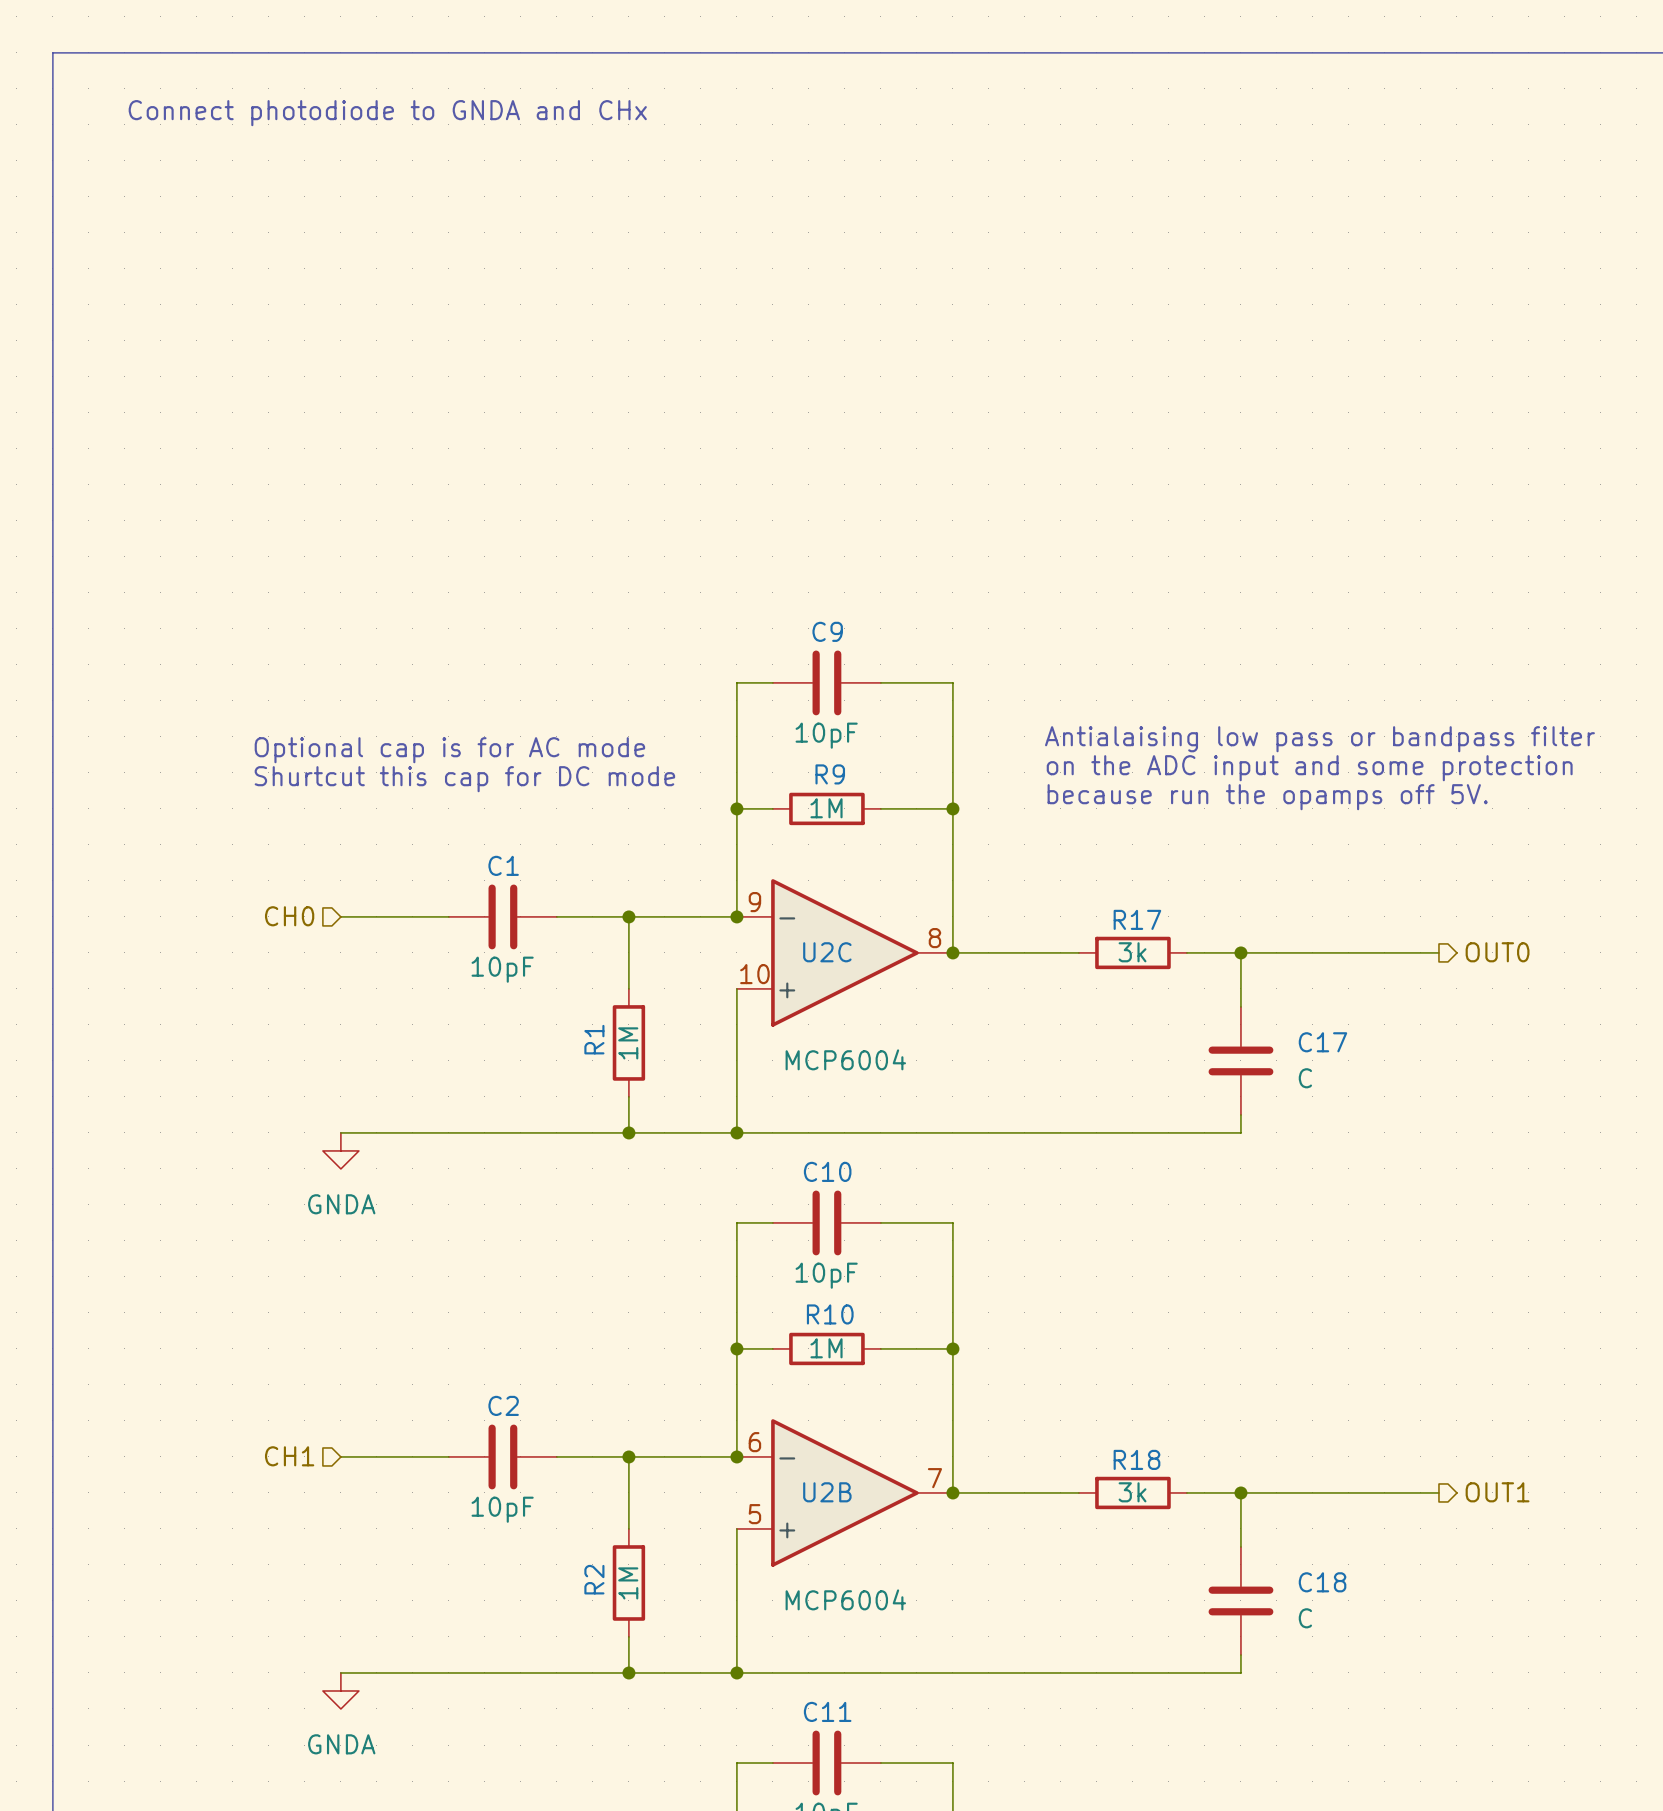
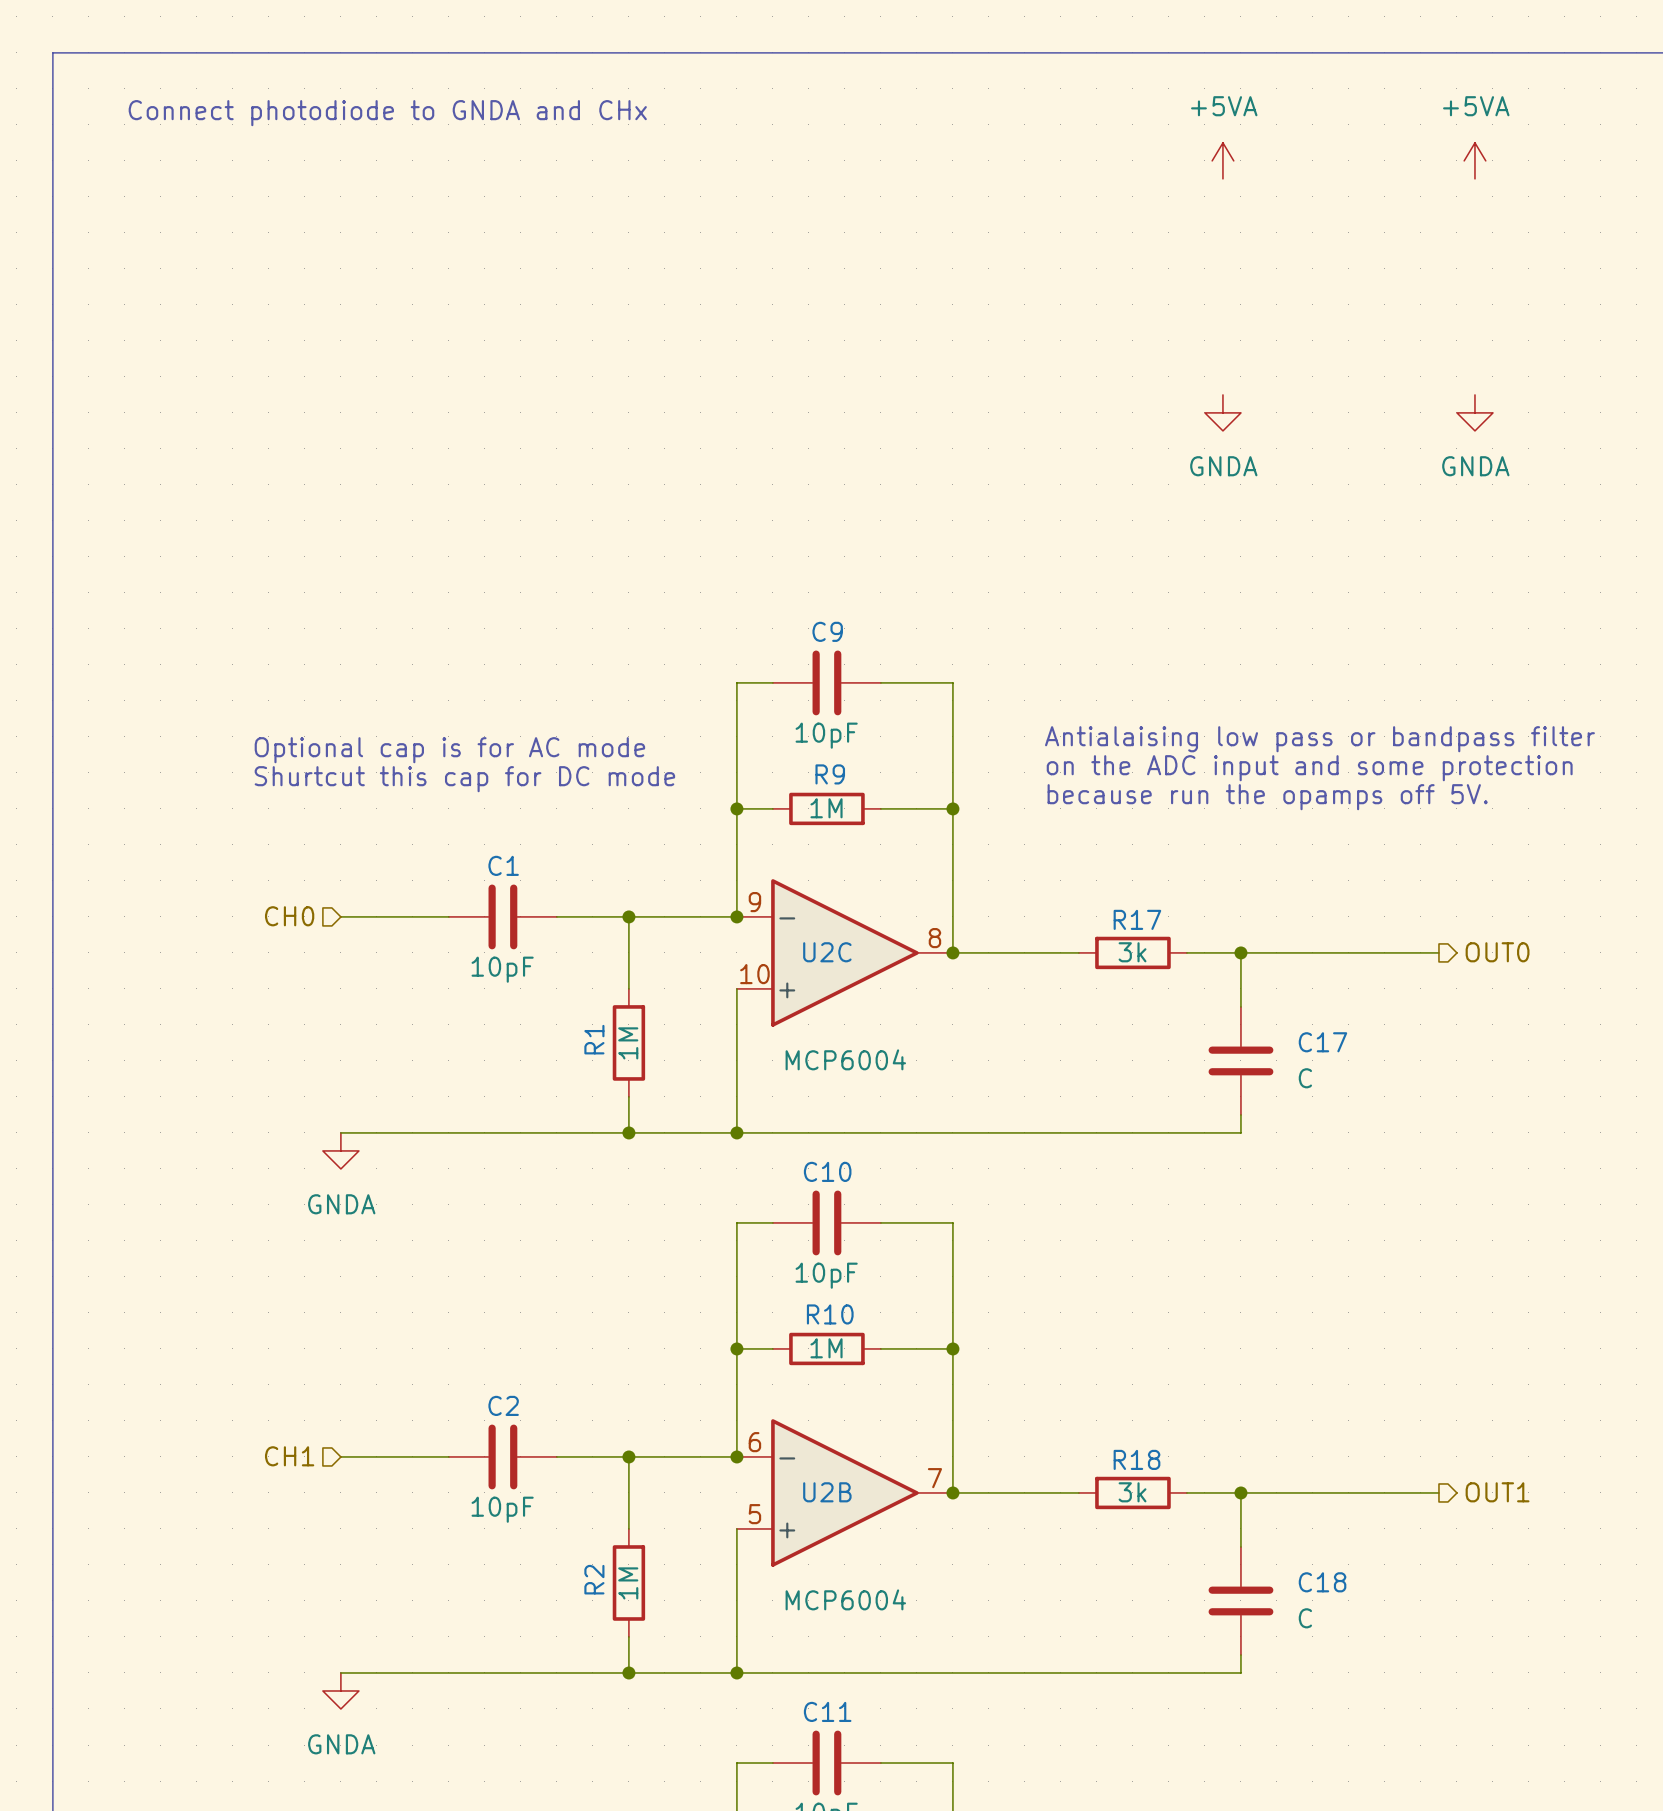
power symbol: none -> +5VA (1222, 160)
power symbol: none -> +5VA (1474, 160)
power symbol: none -> GNDA (1222, 412)
power symbol: none -> GNDA (1474, 412)

